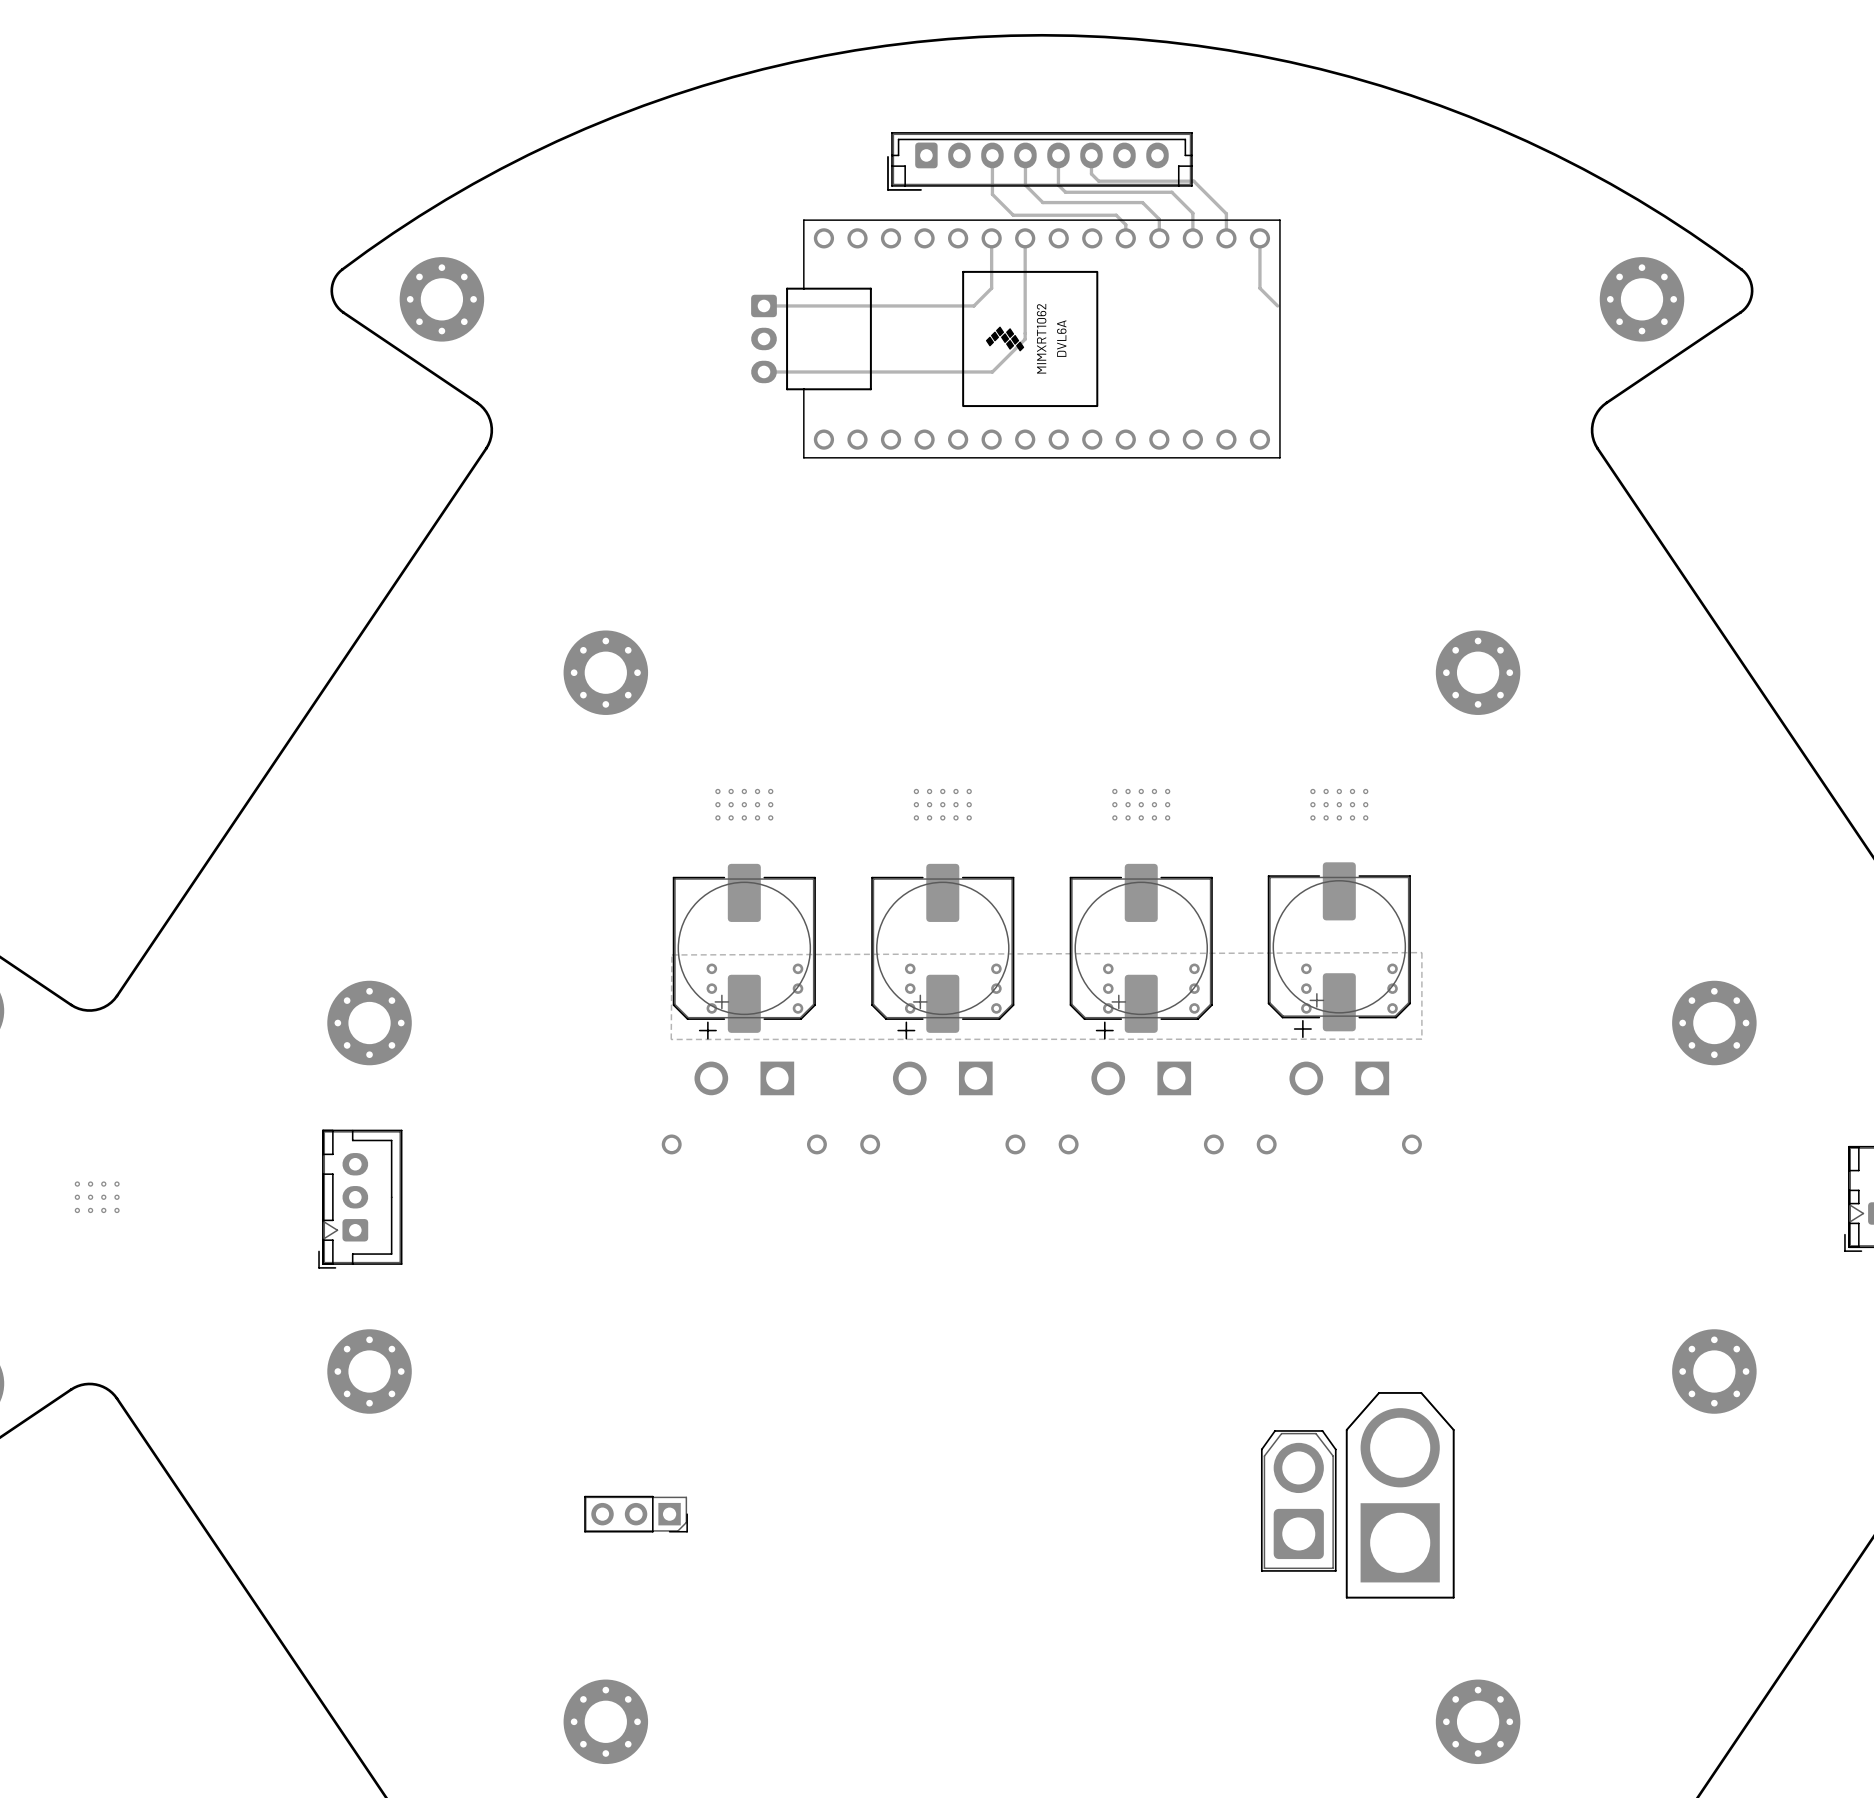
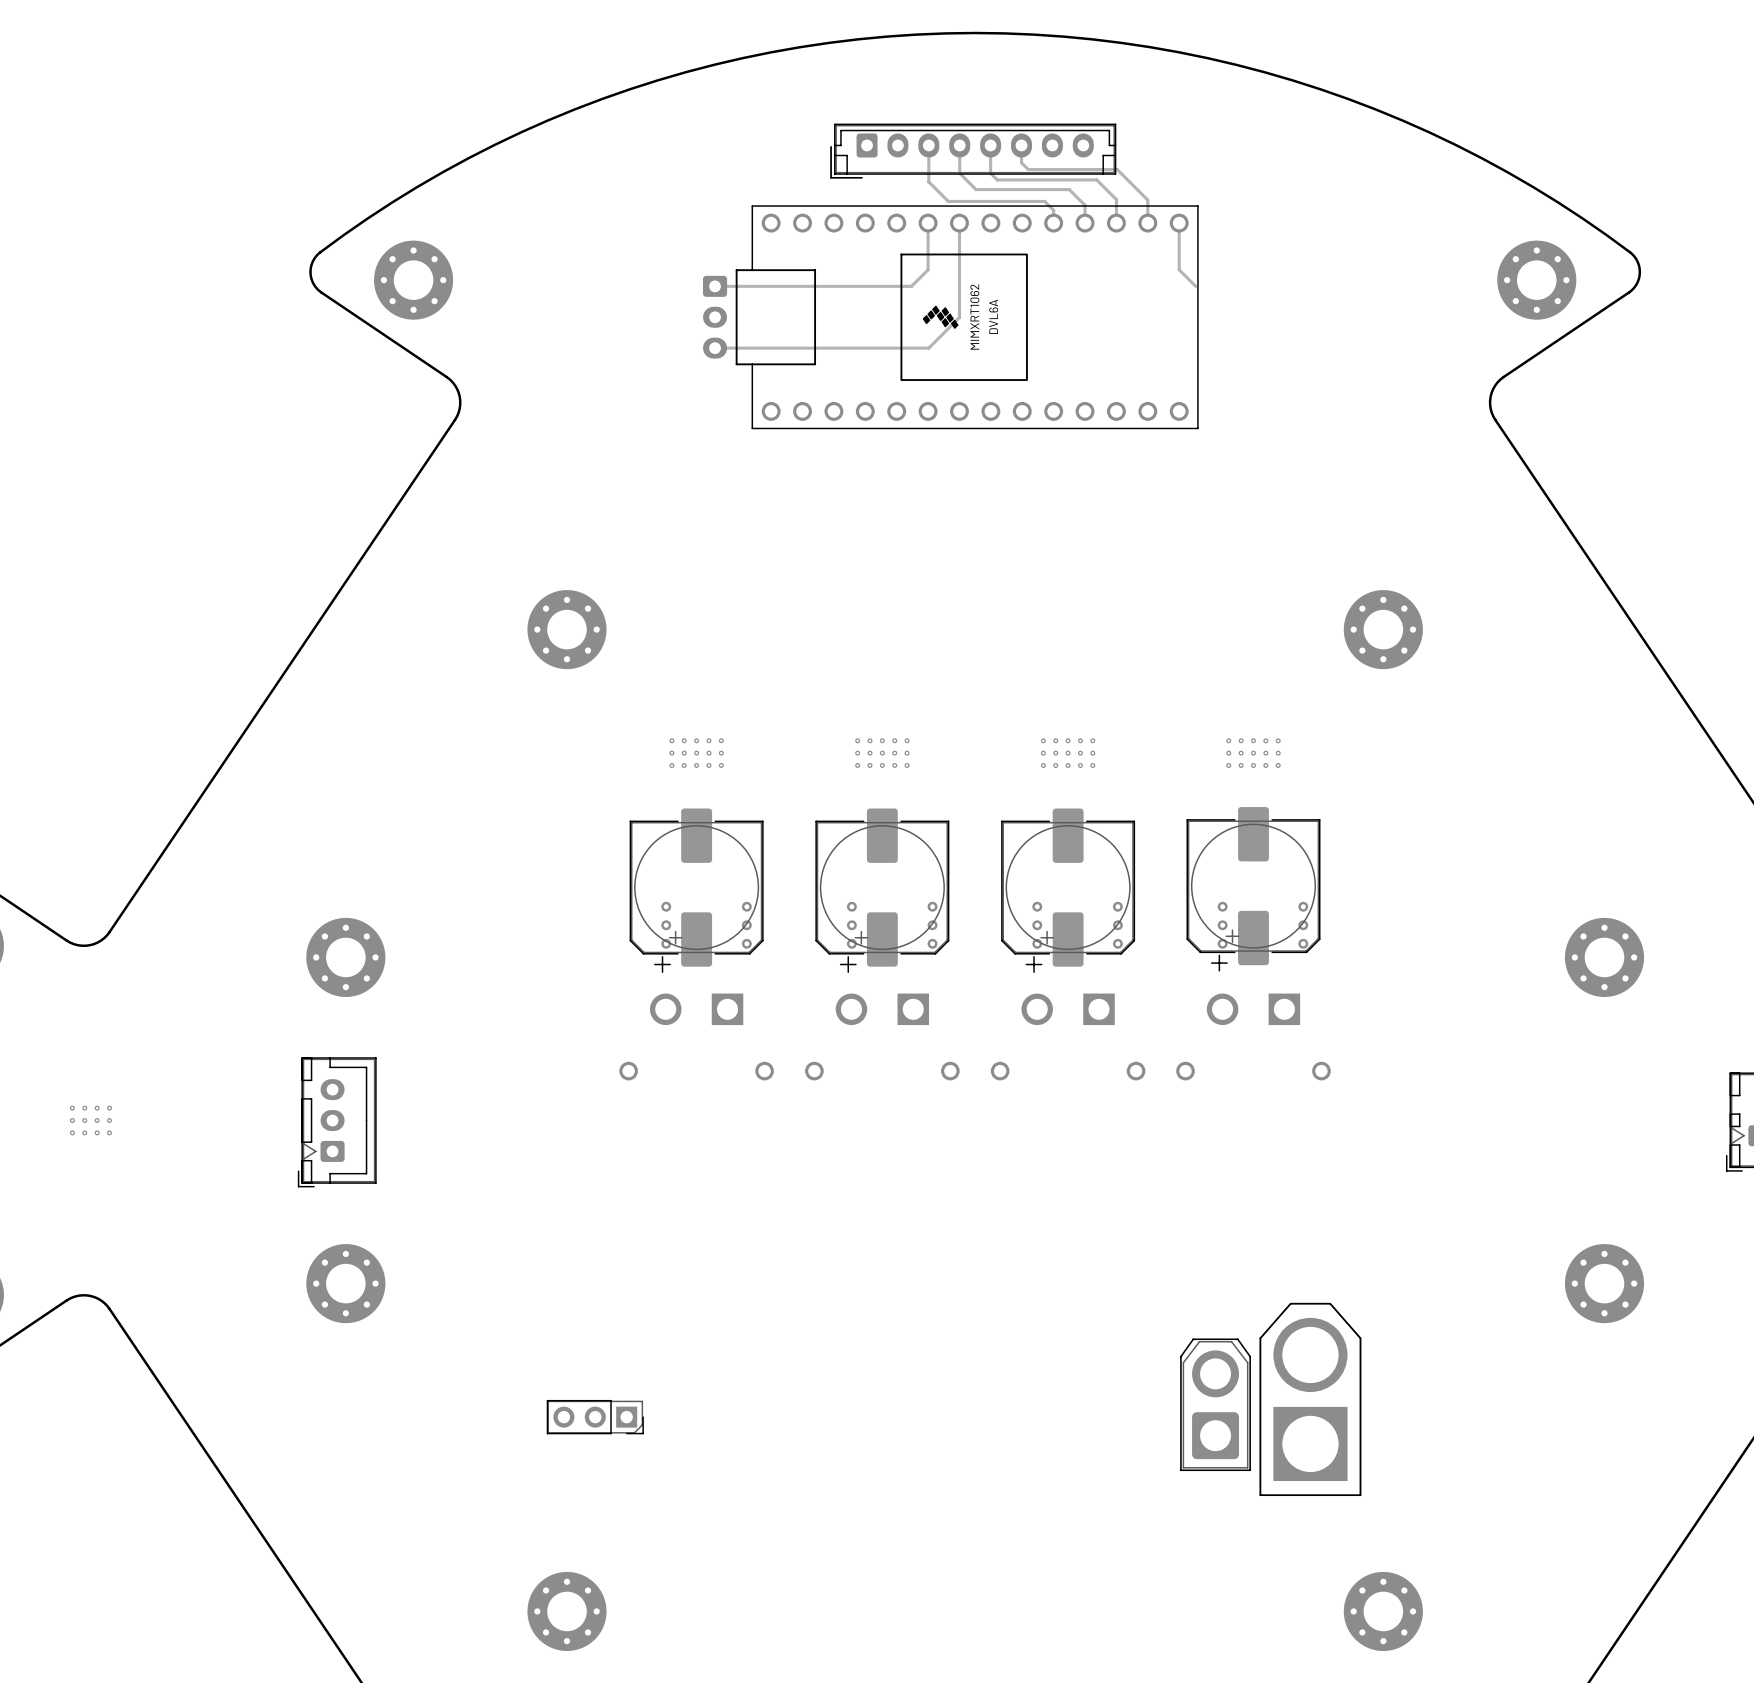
zone outline: (1421, 952) (671, 954) (671, 1039) (1421, 1039) (1421, 952) -> none

